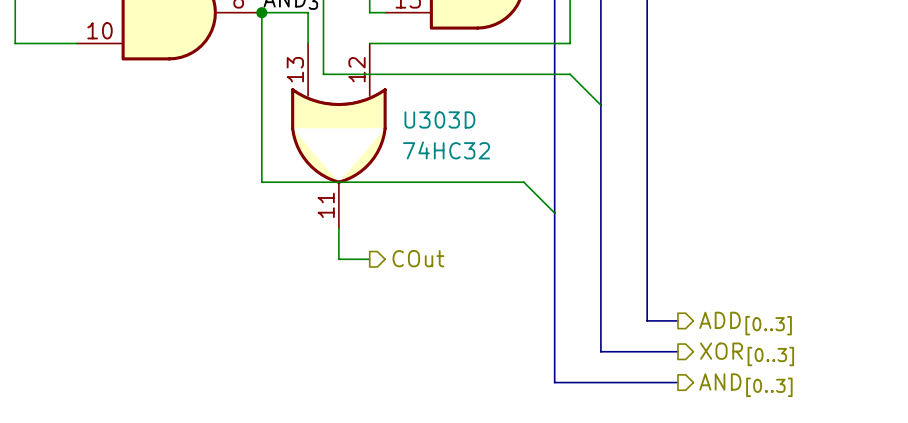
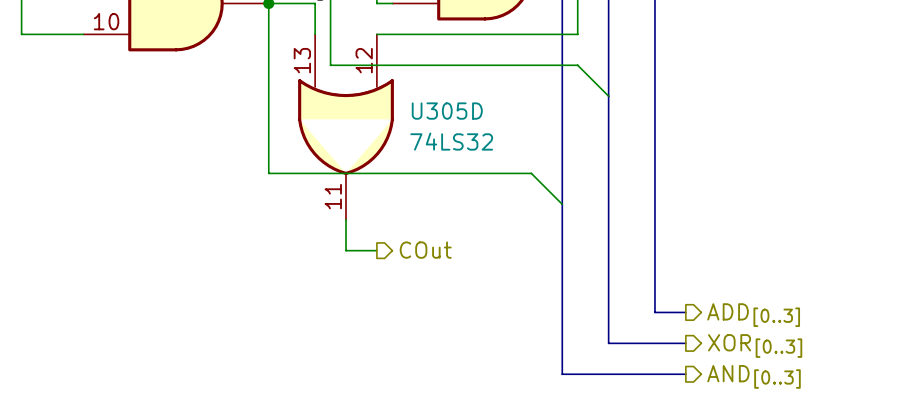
U303D name: U303D (439, 119) -> U305D (447, 111)
U303D value: 74HC32 (446, 150) -> 74LS32 (451, 141)

